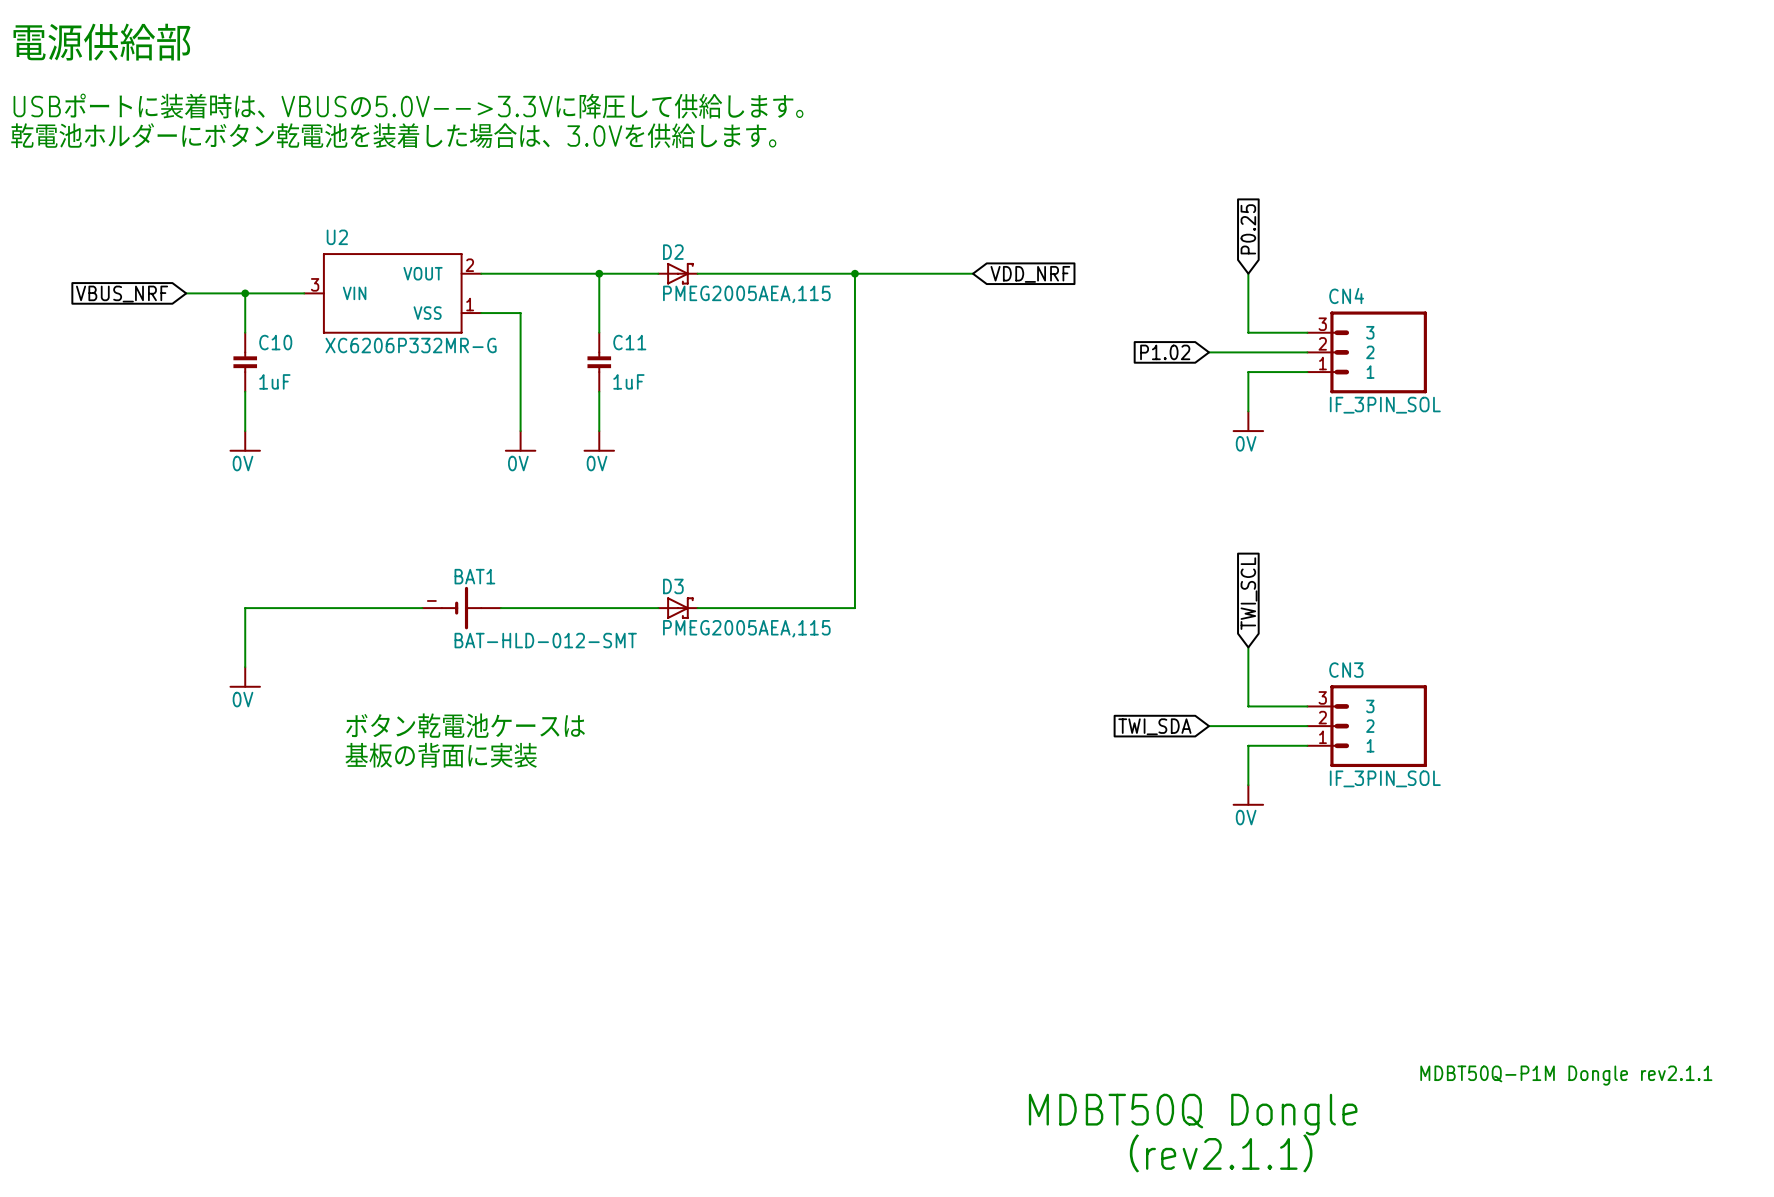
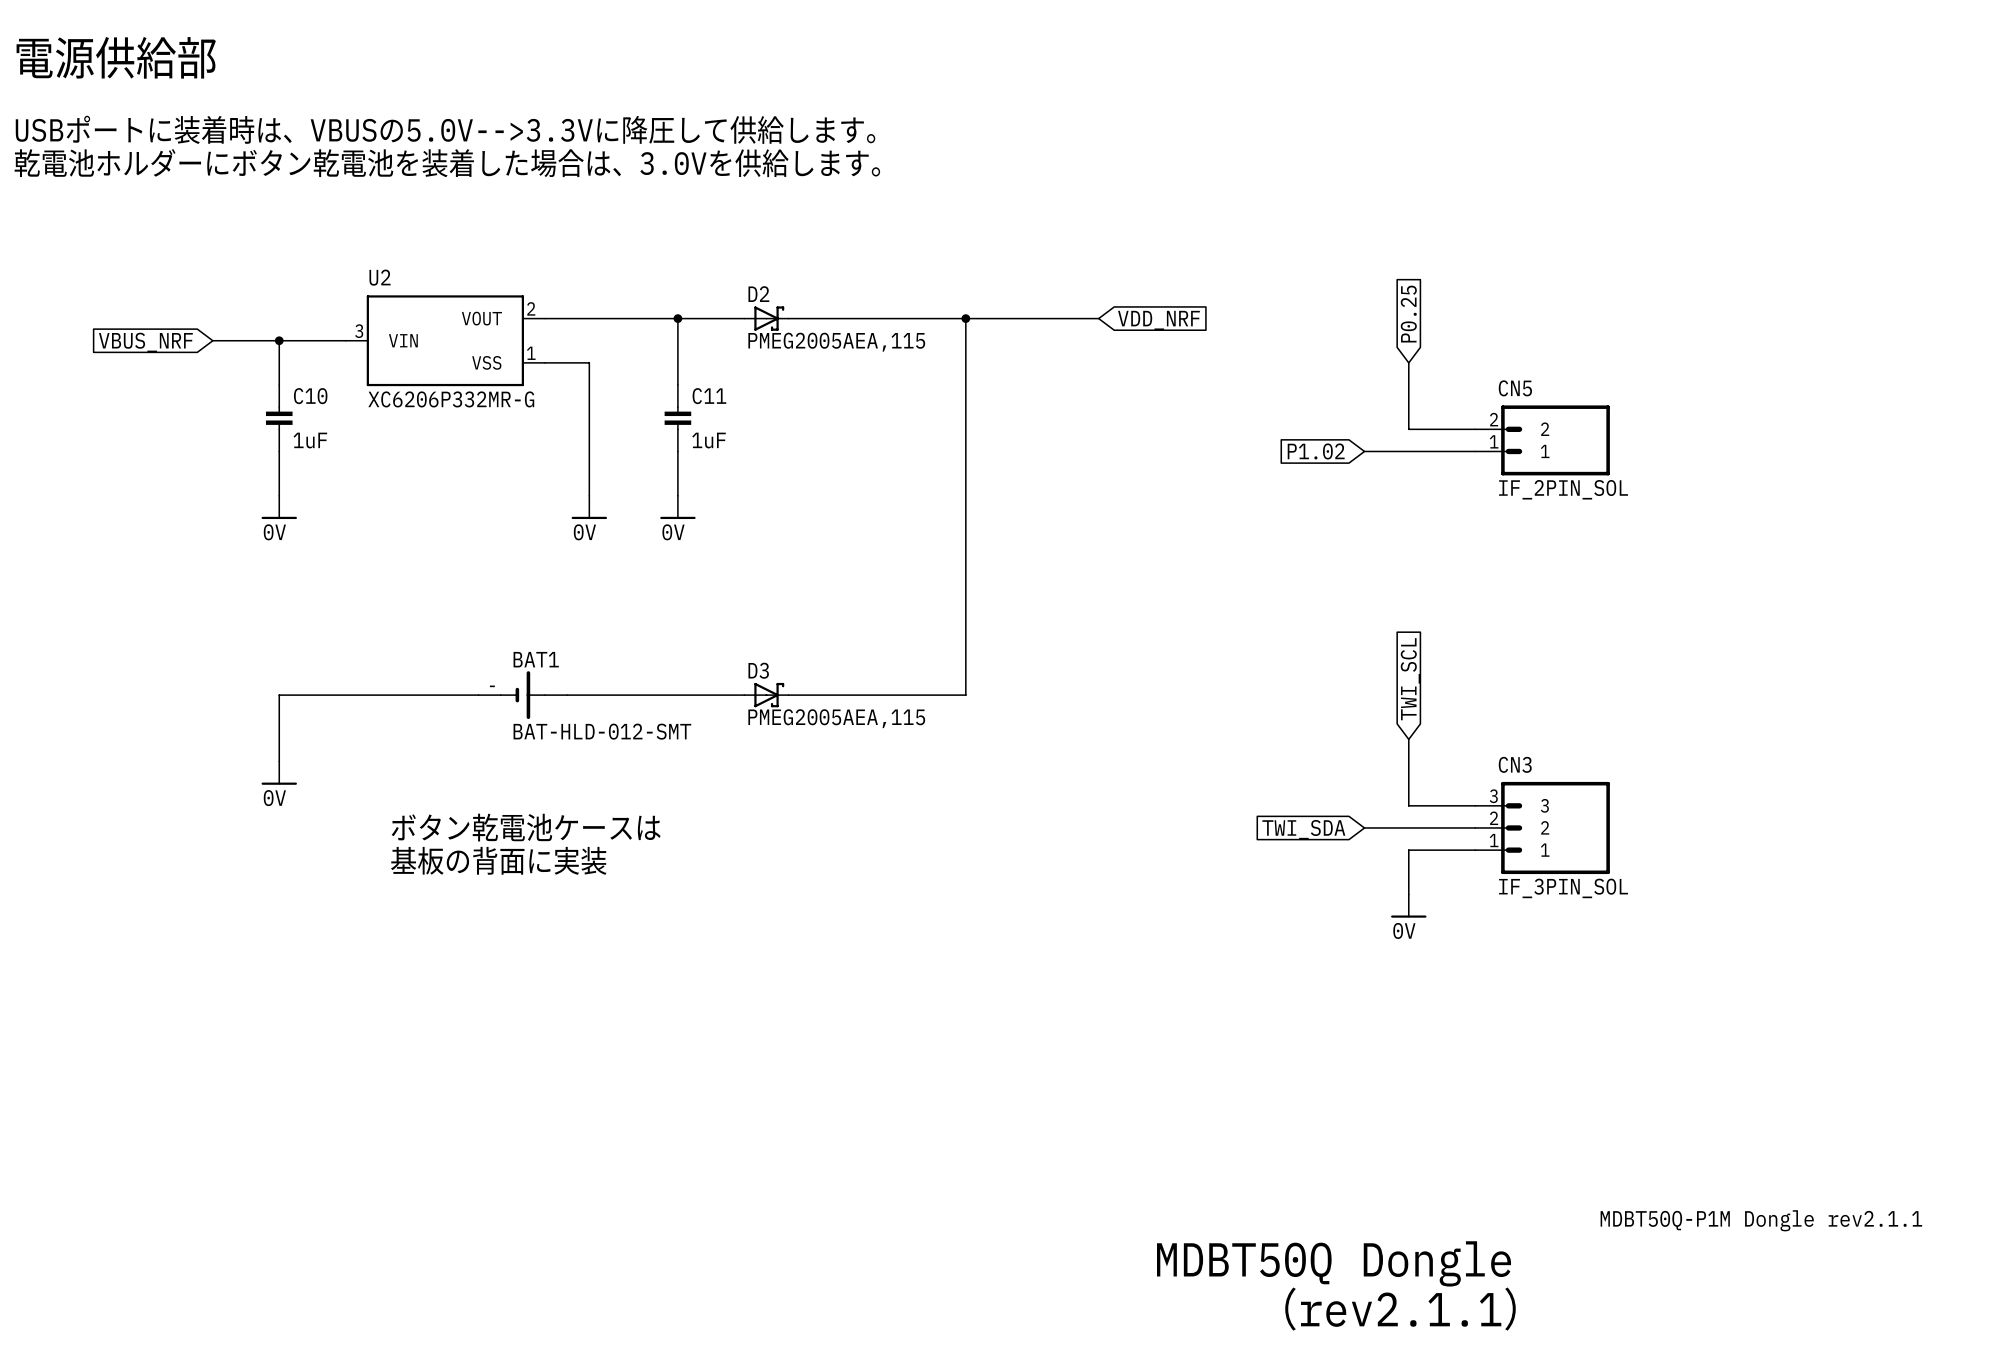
global label position: P0.25 (1248, 229) -> P0.25 (1408, 314)
wire: (1248, 273) (1248, 313) -> none
wire: (1248, 332) (1307, 332) -> (1408, 385) (1408, 429)
global label position: P1.02 (1165, 352) -> P1.02 (1316, 451)
wire: (1209, 352) (1307, 352) -> (1364, 451) (1475, 451)
CN4: IF_3PIN_SOL (1367, 352) -> none
wire: (1248, 372) (1248, 411) -> none
CN5: none -> IF_2PIN_SOL (1542, 440)
power symbol: 0V (1248, 421) -> none

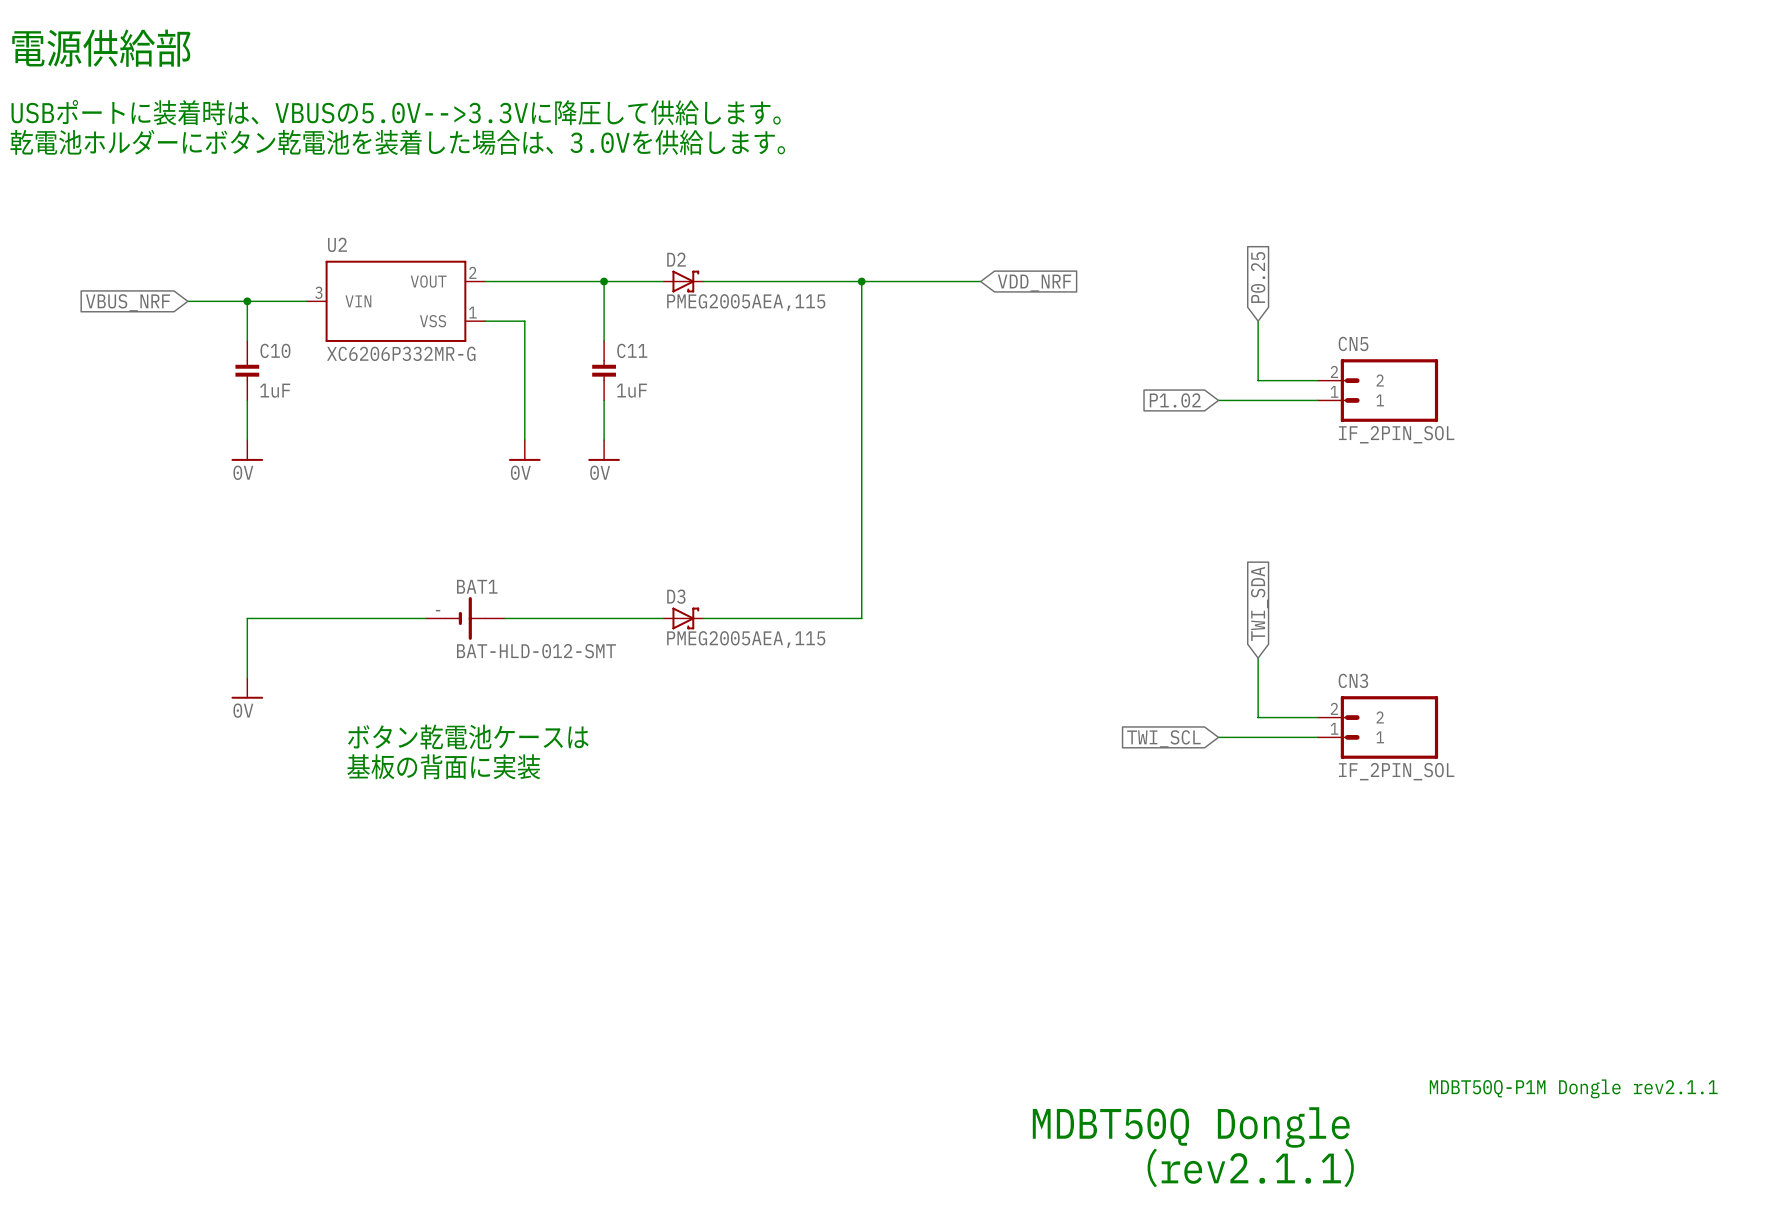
global label: TWI_SCL (1410, 679) -> TWI_SDA (1259, 603)
CN3 symbol: [1475, 781, 1610, 875] -> [1317, 696, 1439, 759]
global label: TWI_SDA (1303, 829) -> TWI_SCL (1163, 738)
wire: (1475, 850) (1408, 850) (1408, 894) -> none
CN3 value: IF_3PIN_SOL (1563, 888) -> IF_2PIN_SOL (1396, 771)
power symbol: 0V (1408, 906) -> none

